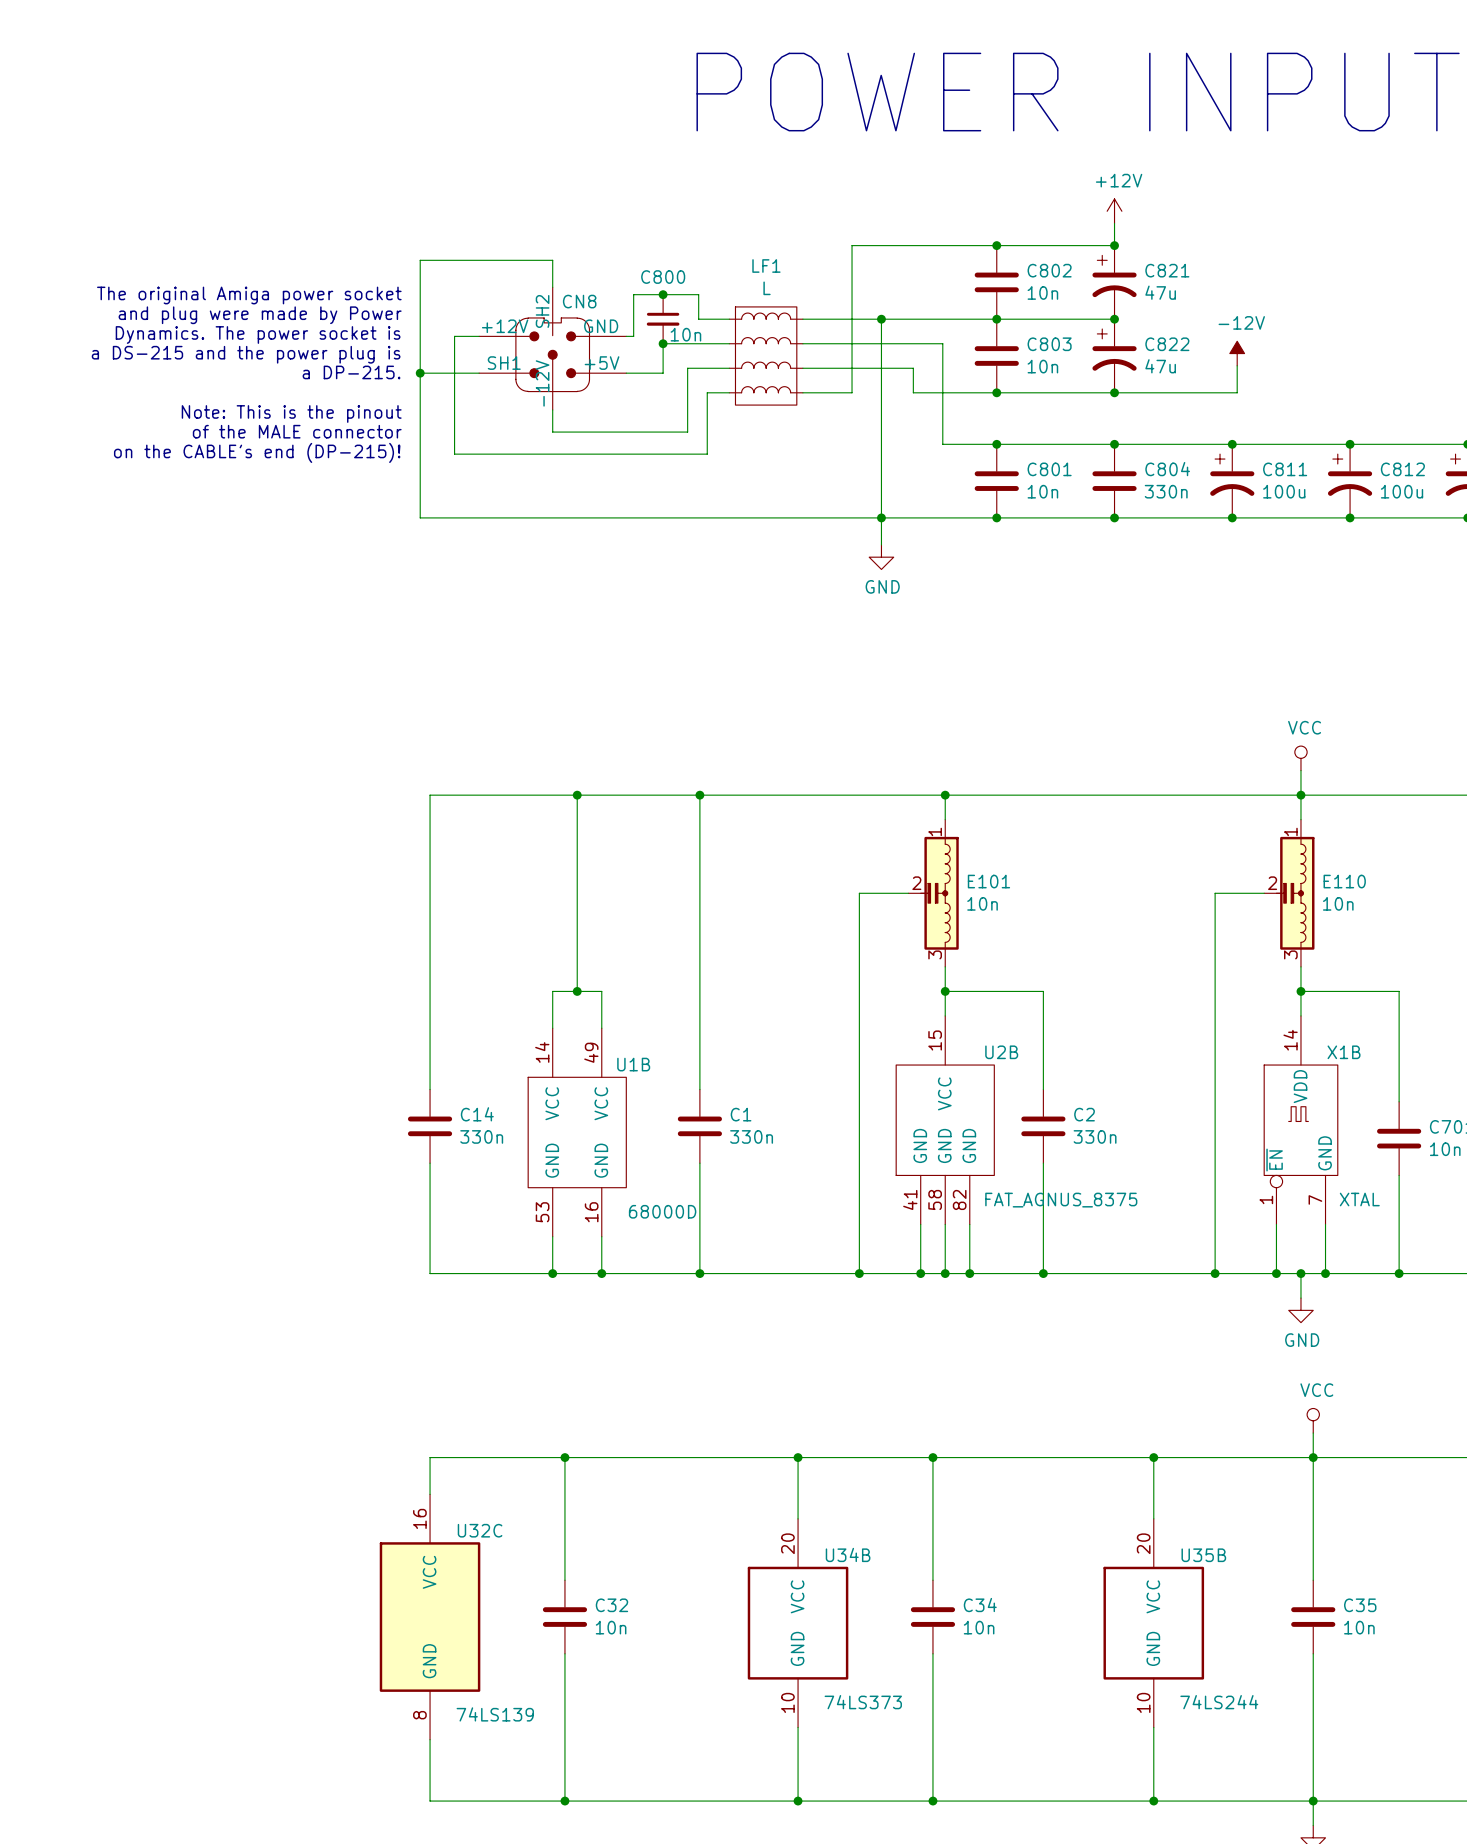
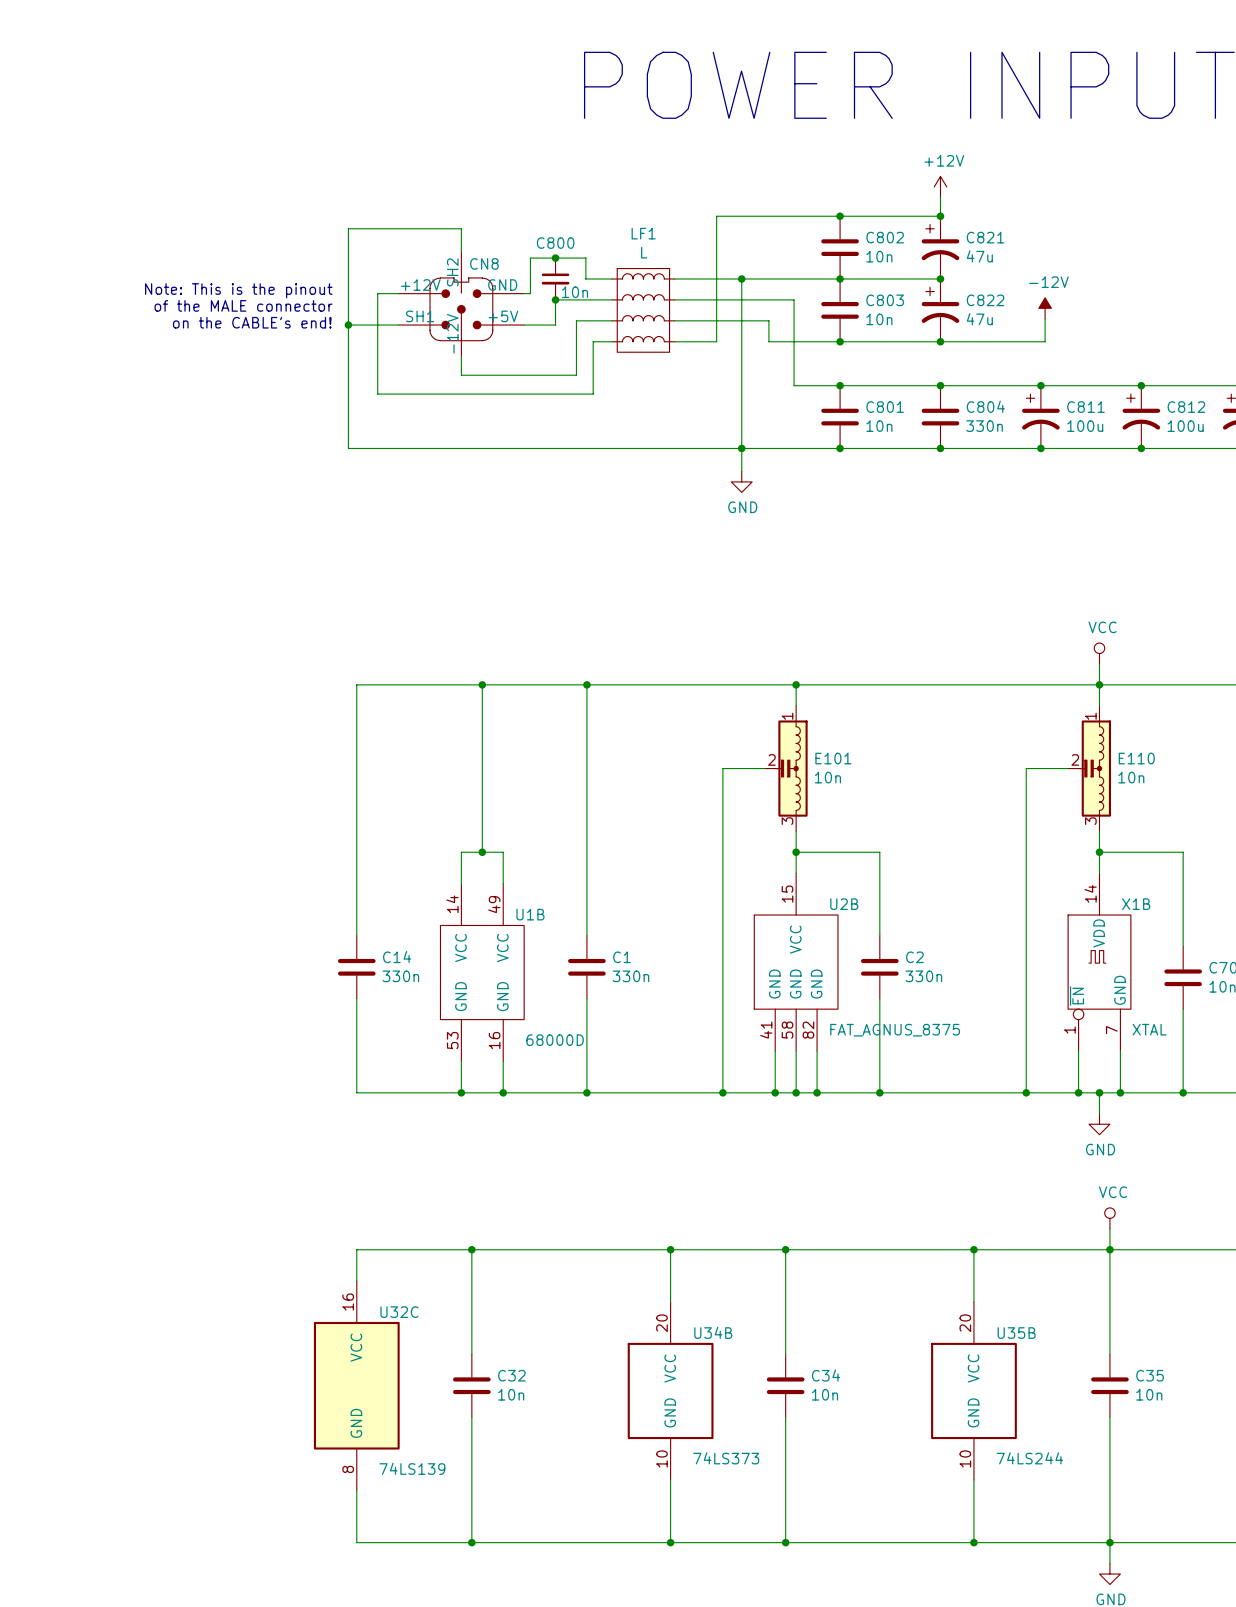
text: The original Amiga power socket (249, 295) -> none
text: and plug were made by Power (260, 315) -> none
text: Dynamics. The power socket is (258, 334) -> Note: This is the pinout (238, 290)
text: a DS-215 and the power plug is (246, 354) -> of the MALE connector (243, 305)
text: a DP-215. (351, 372) -> on the CABLE's end! (252, 322)
text: Note: This is the pinout (291, 413) -> none
text: of the MALE connector (297, 431) -> none
text: on the CABLE's end (DP-215)! (257, 452) -> none

